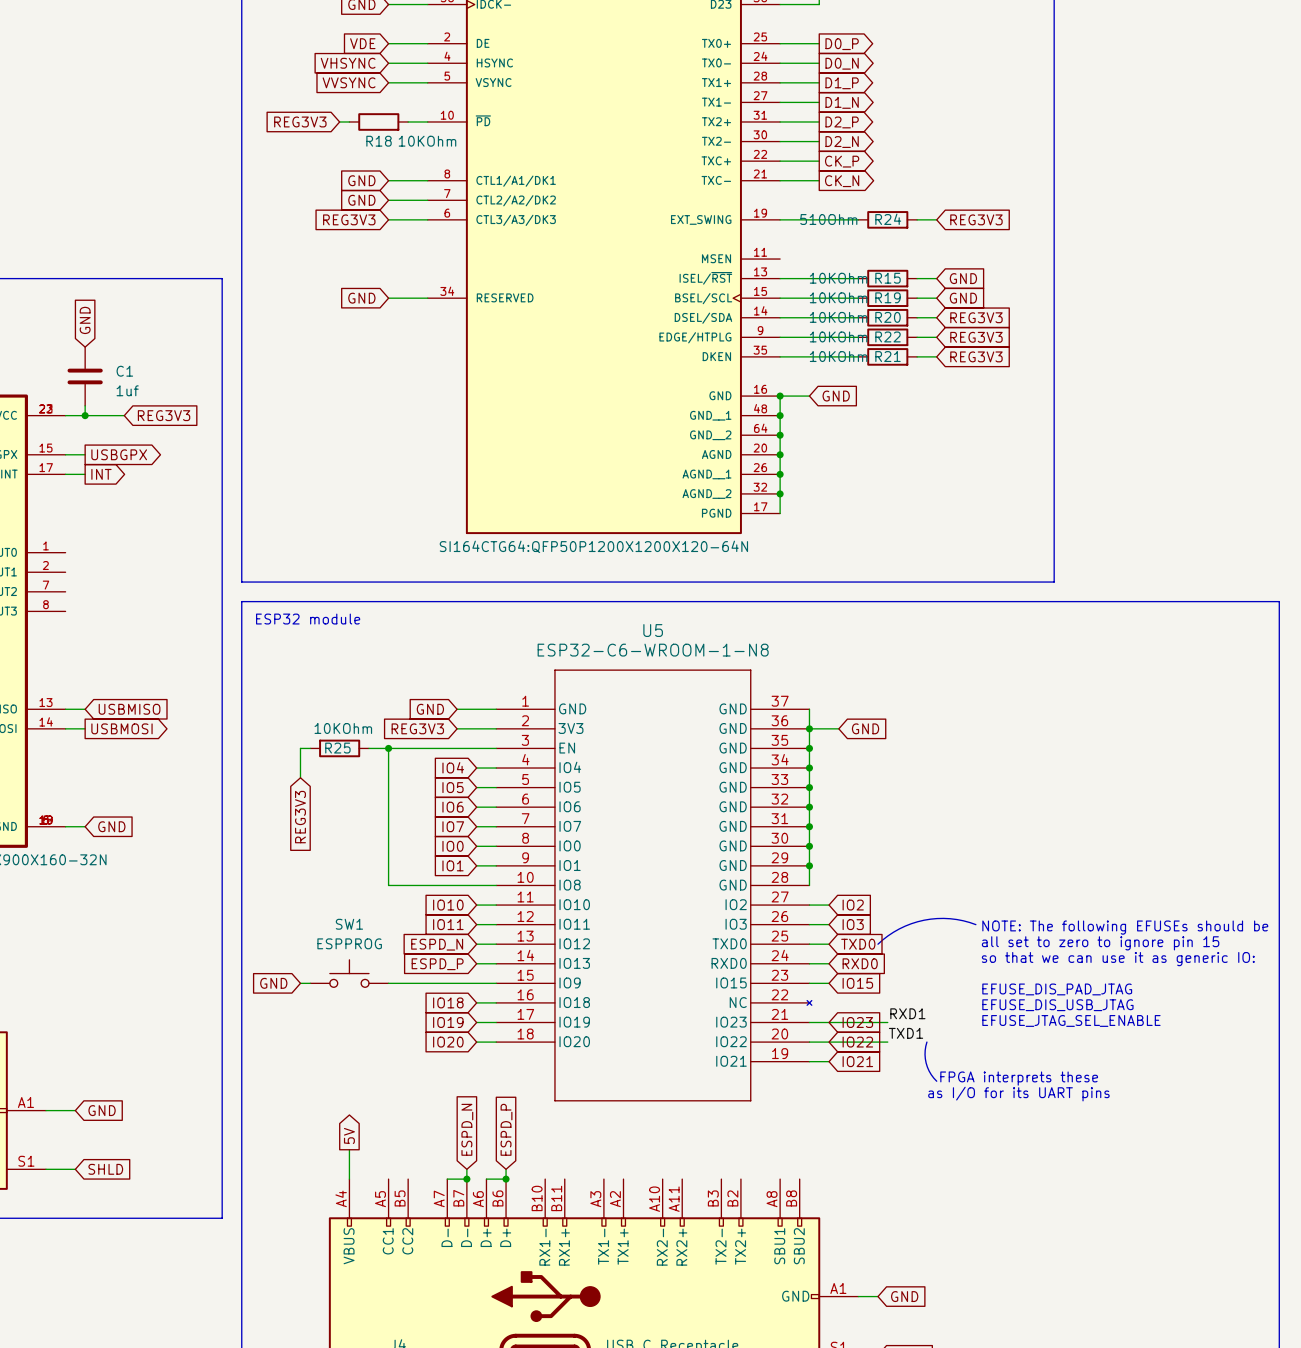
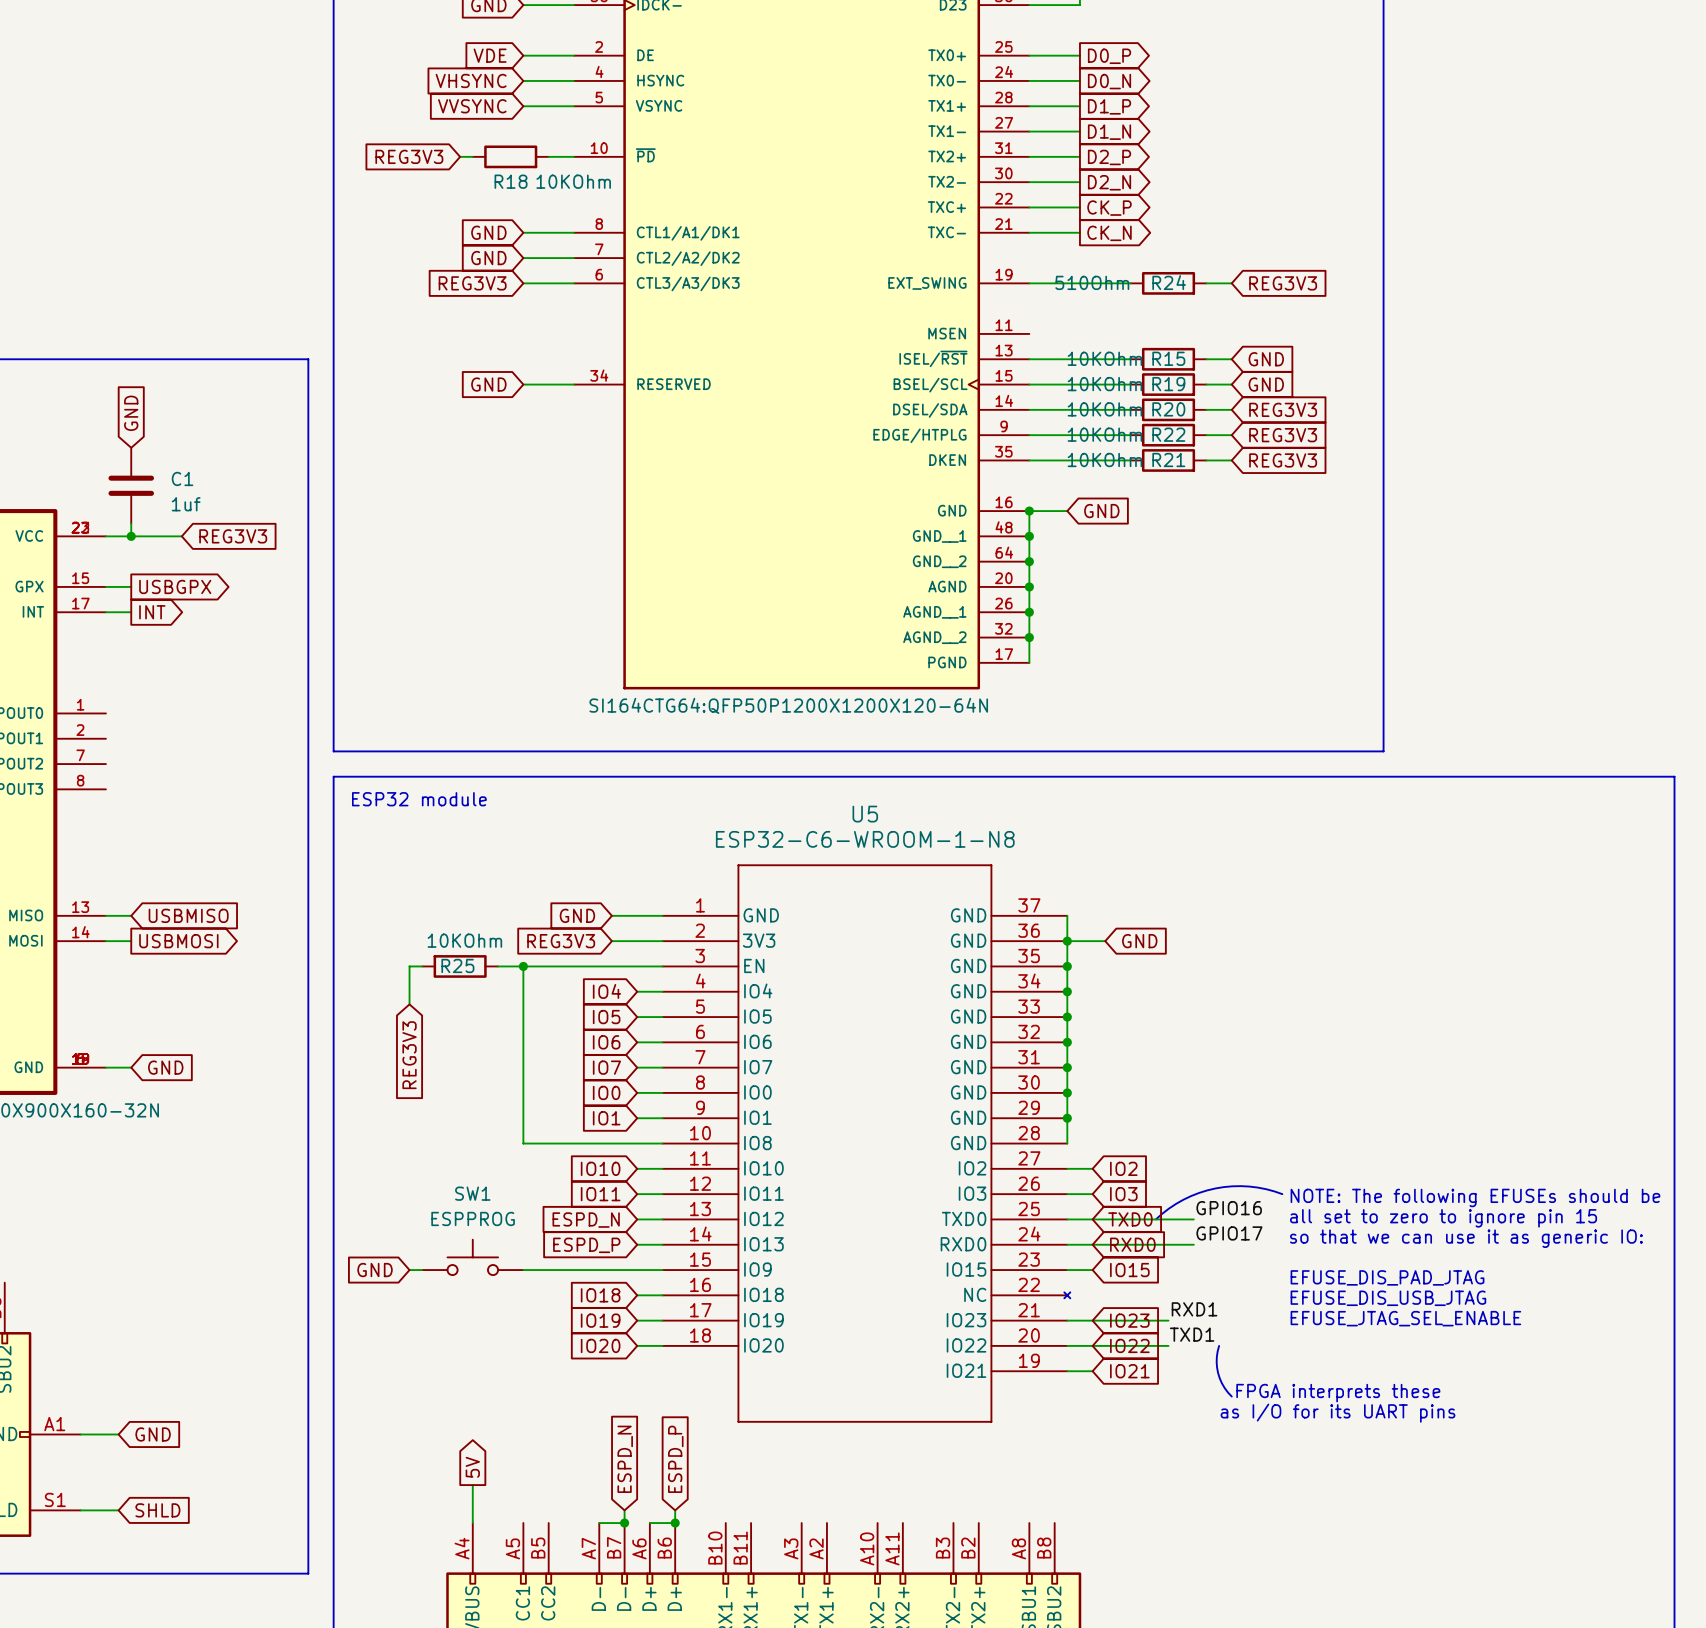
label: none -> GPIO16 (1229, 1208)
wire: none -> (1092, 1219) (1193, 1219)
label: none -> GPIO17 (1229, 1233)
wire: none -> (1092, 1244) (1193, 1244)

